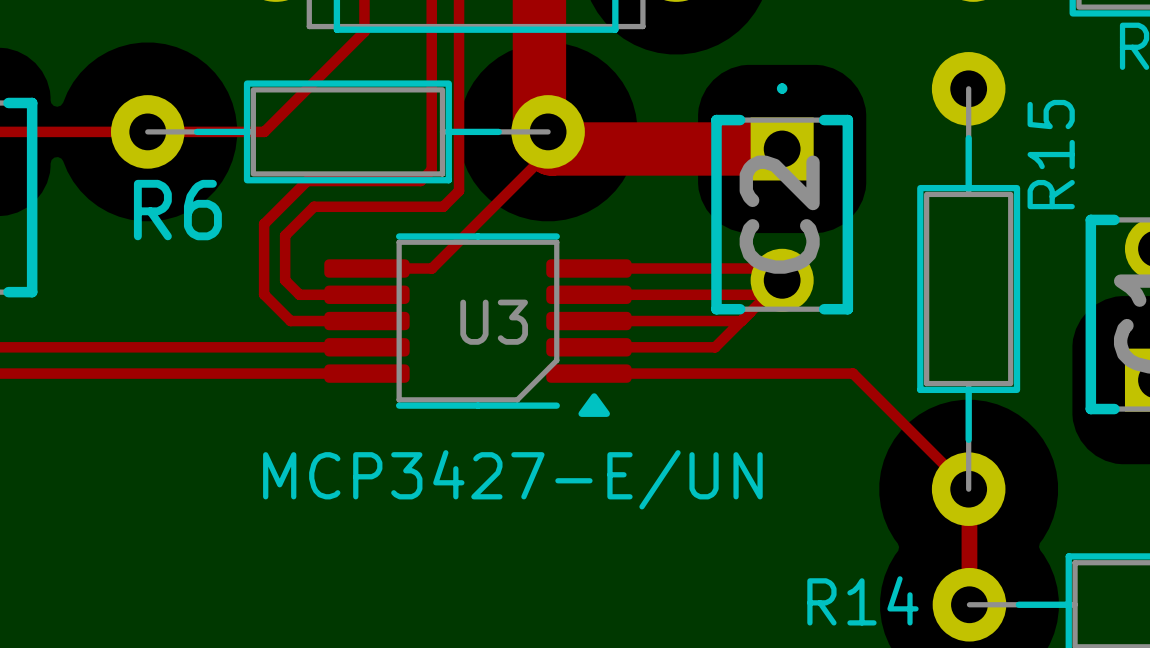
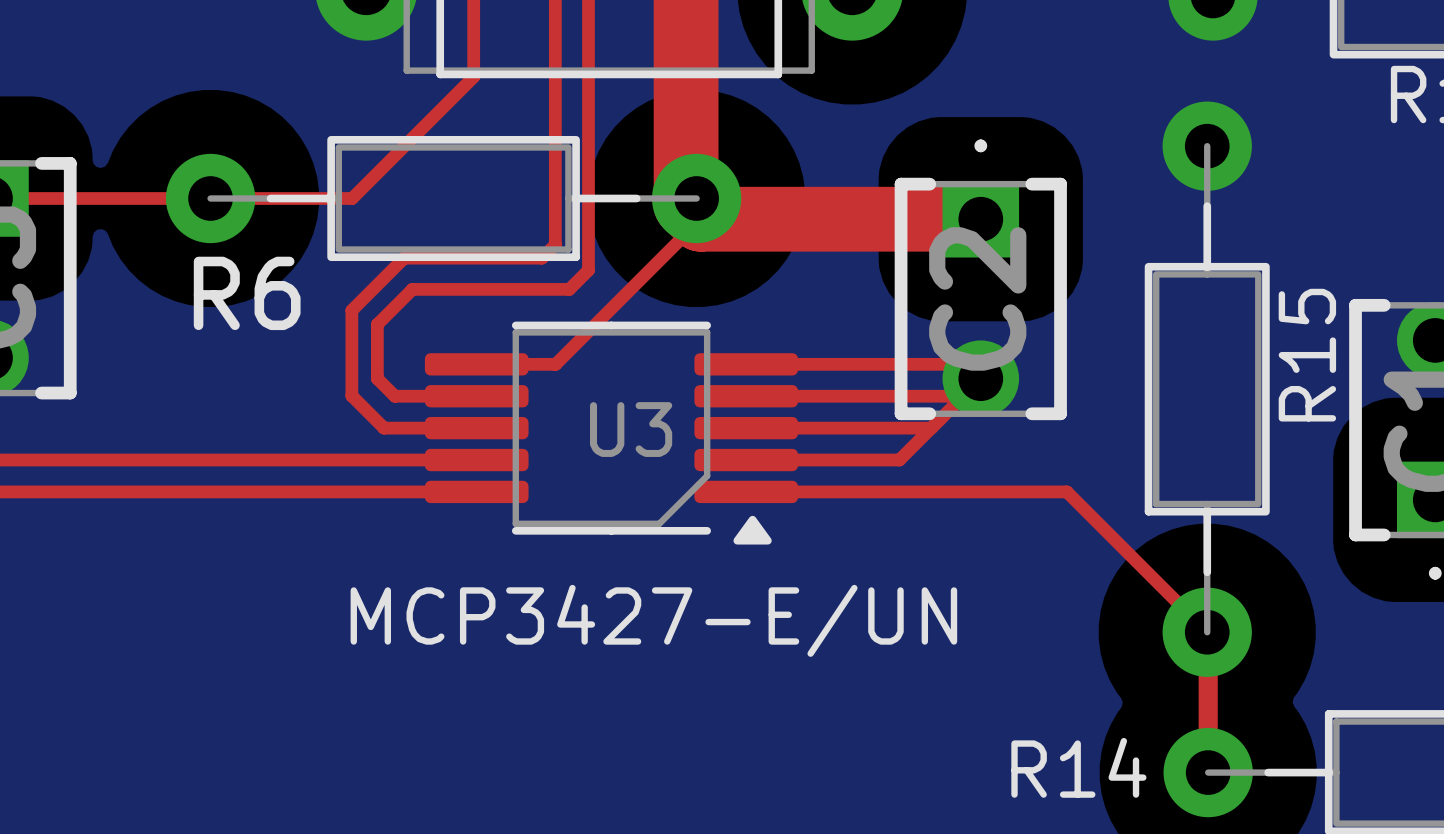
R15 name position: R15 (1051, 154) -> R15 (1307, 355)

